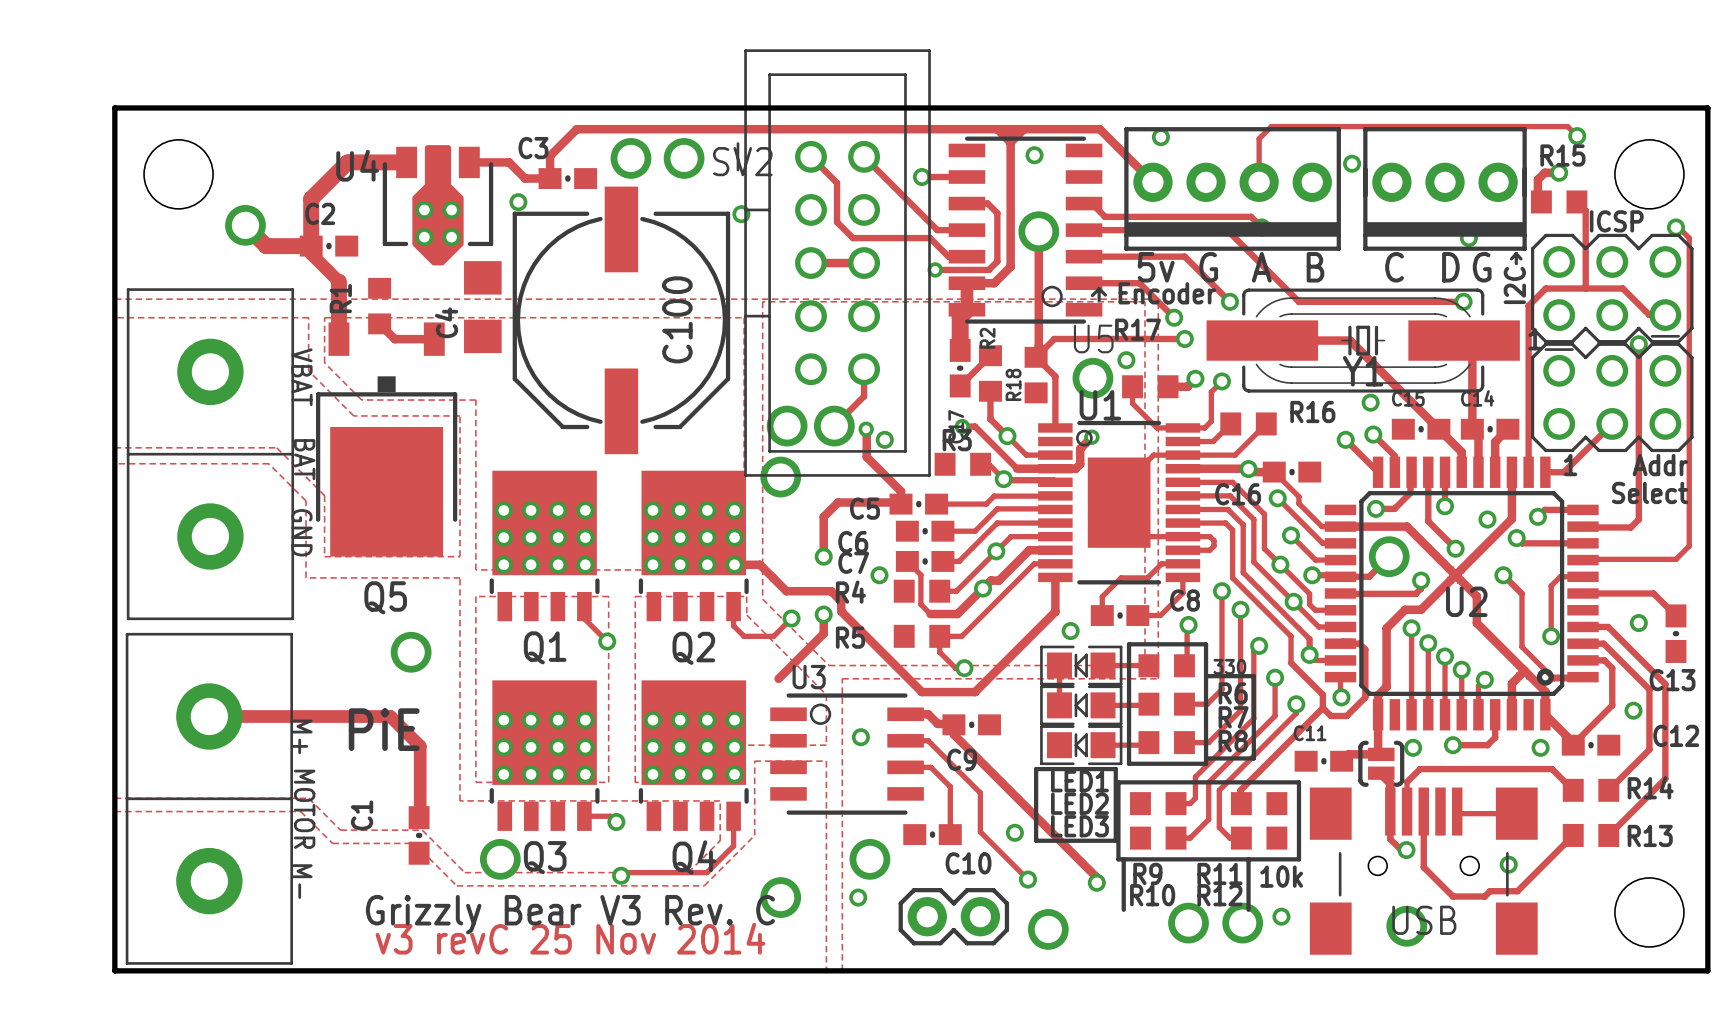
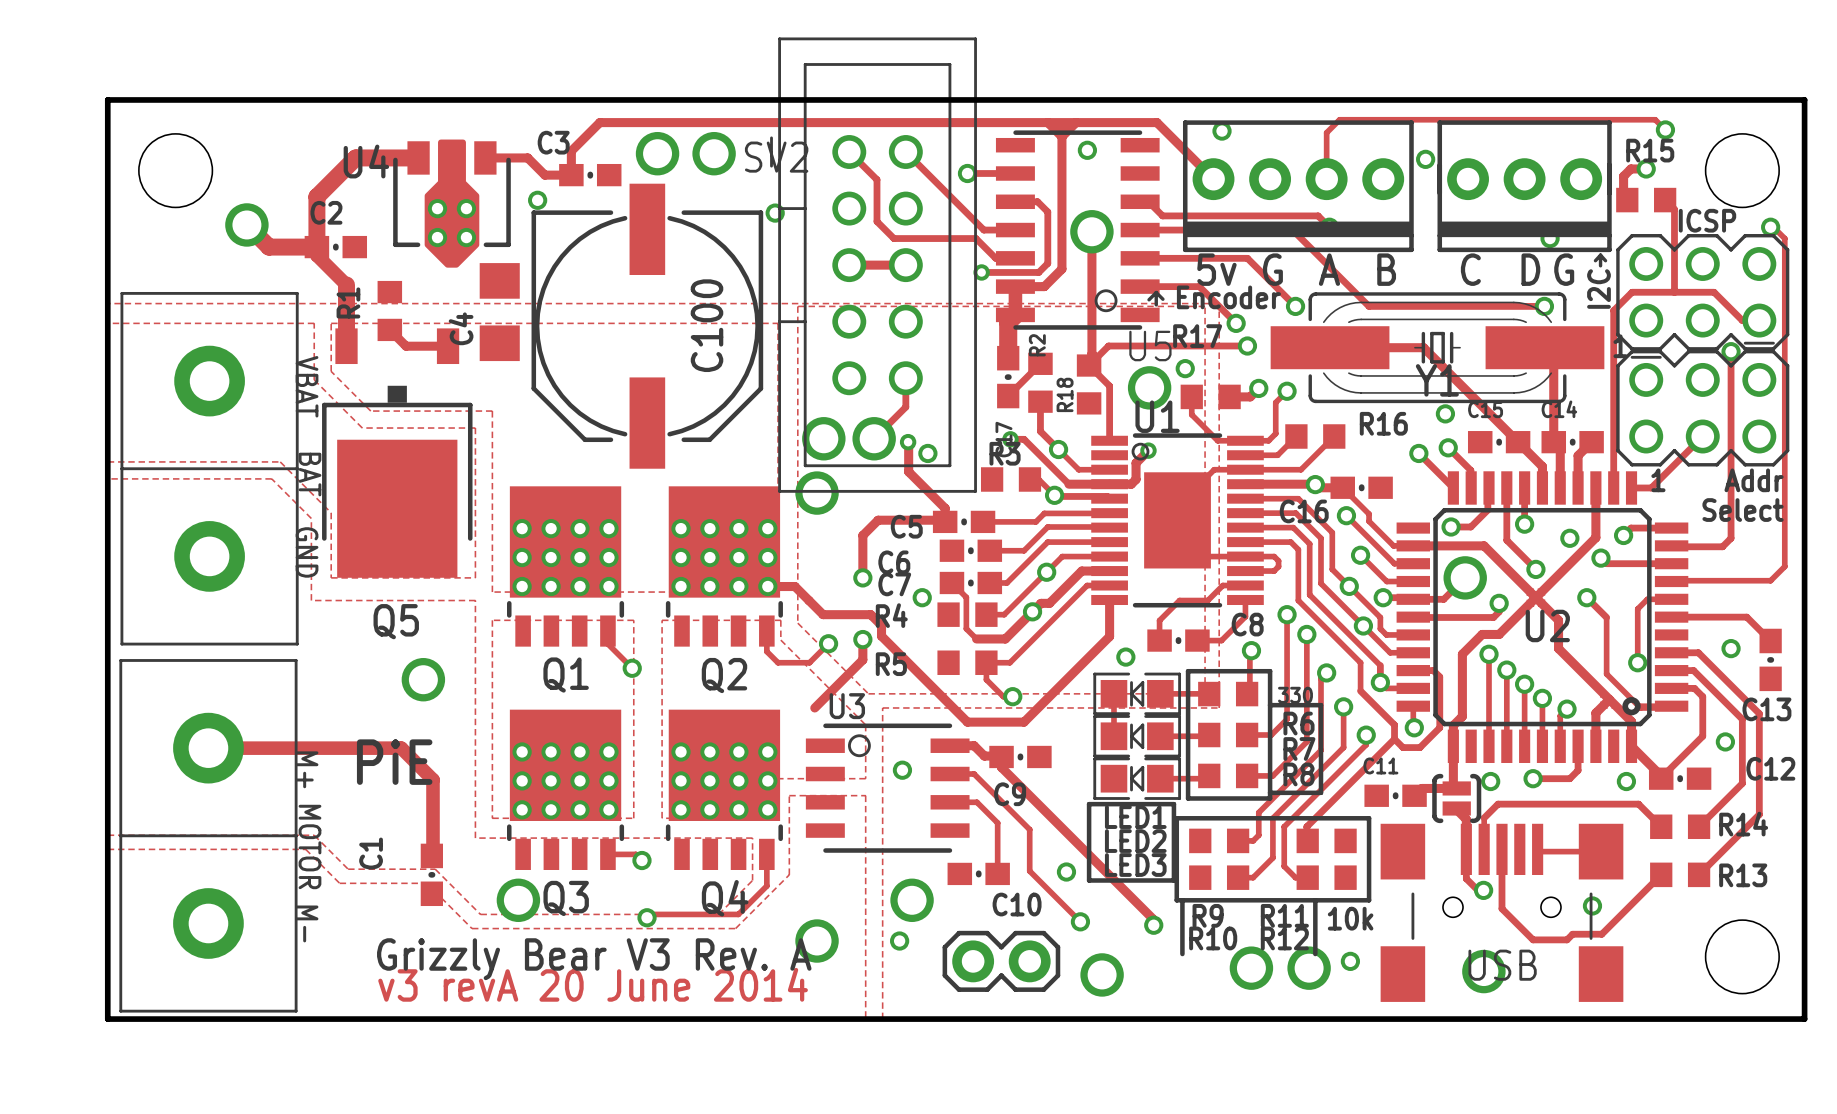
text: Grizzly Bear V3 Rev. C (570, 914) -> Grizzly Bear V3 Rev. A (594, 959)
text: v3 revC 25 Nov 2014 (570, 938) -> v3 revA 20 June 2014 (593, 984)

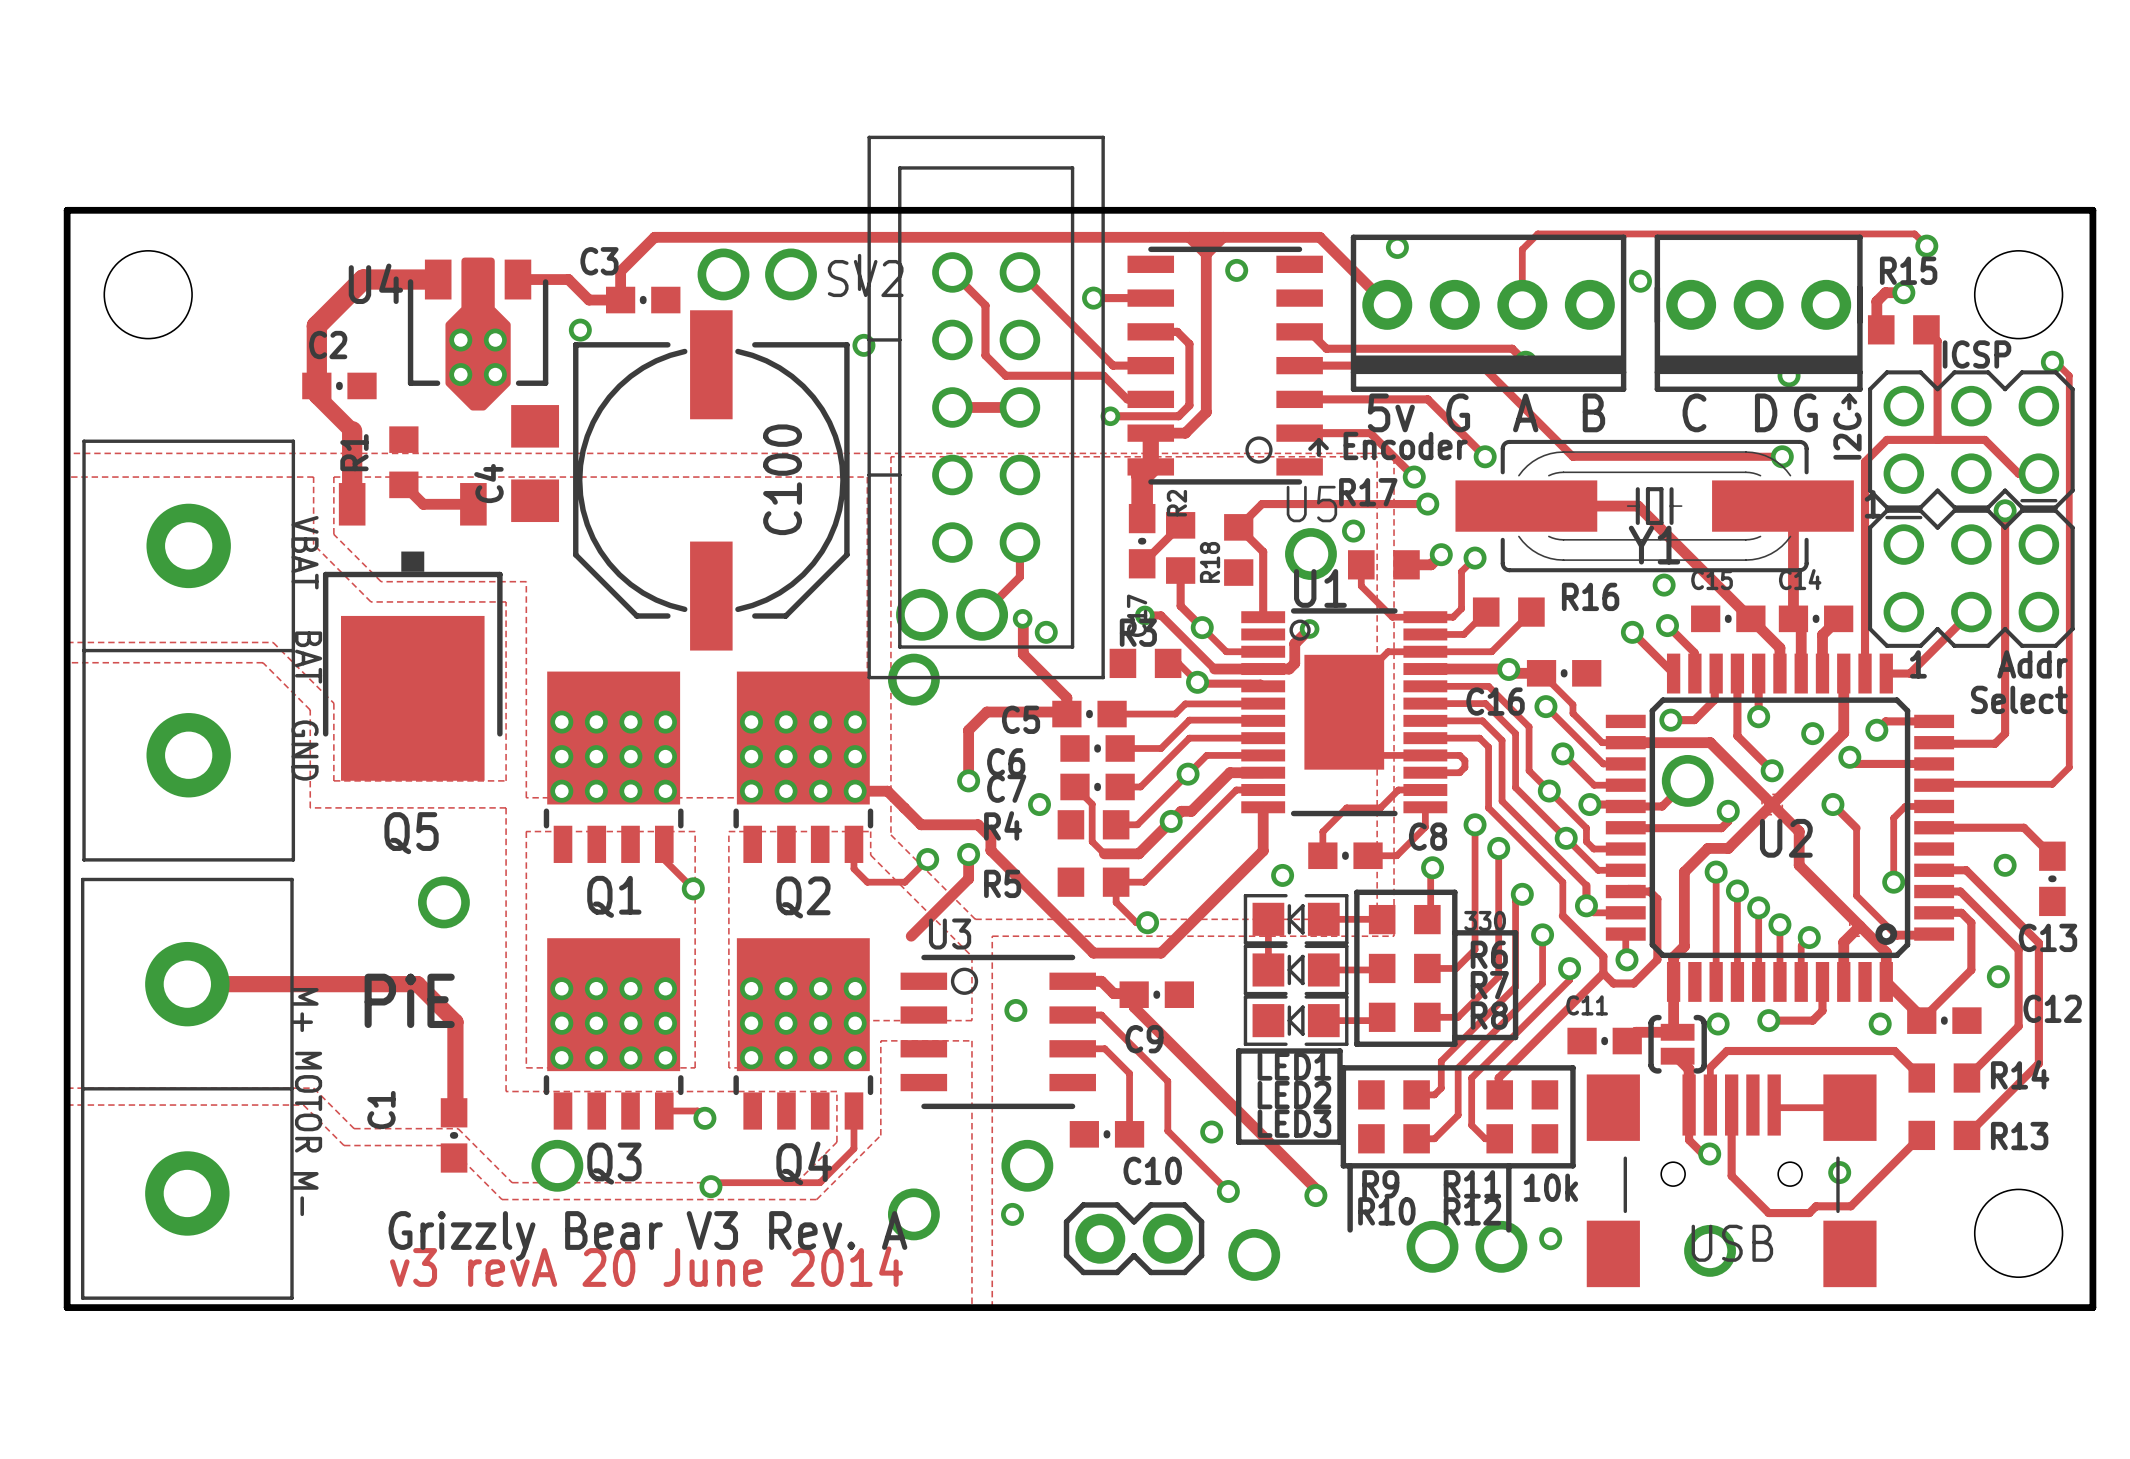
track: (246, 224) (269, 247) (316, 247) -> none
via: (246, 224) -> none
track: (1091, 231) (1091, 353) (1095, 357) (1091, 357) (1091, 362) (1089, 365) -> none
via: (1091, 231) -> none

